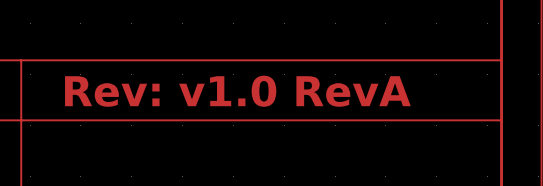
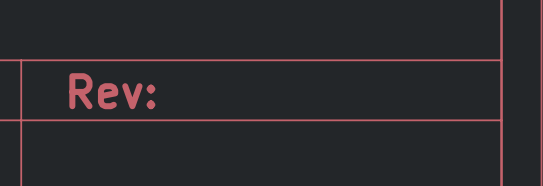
title block: Rev: v1.0 RevA (237, 91) -> Rev: (112, 91)

